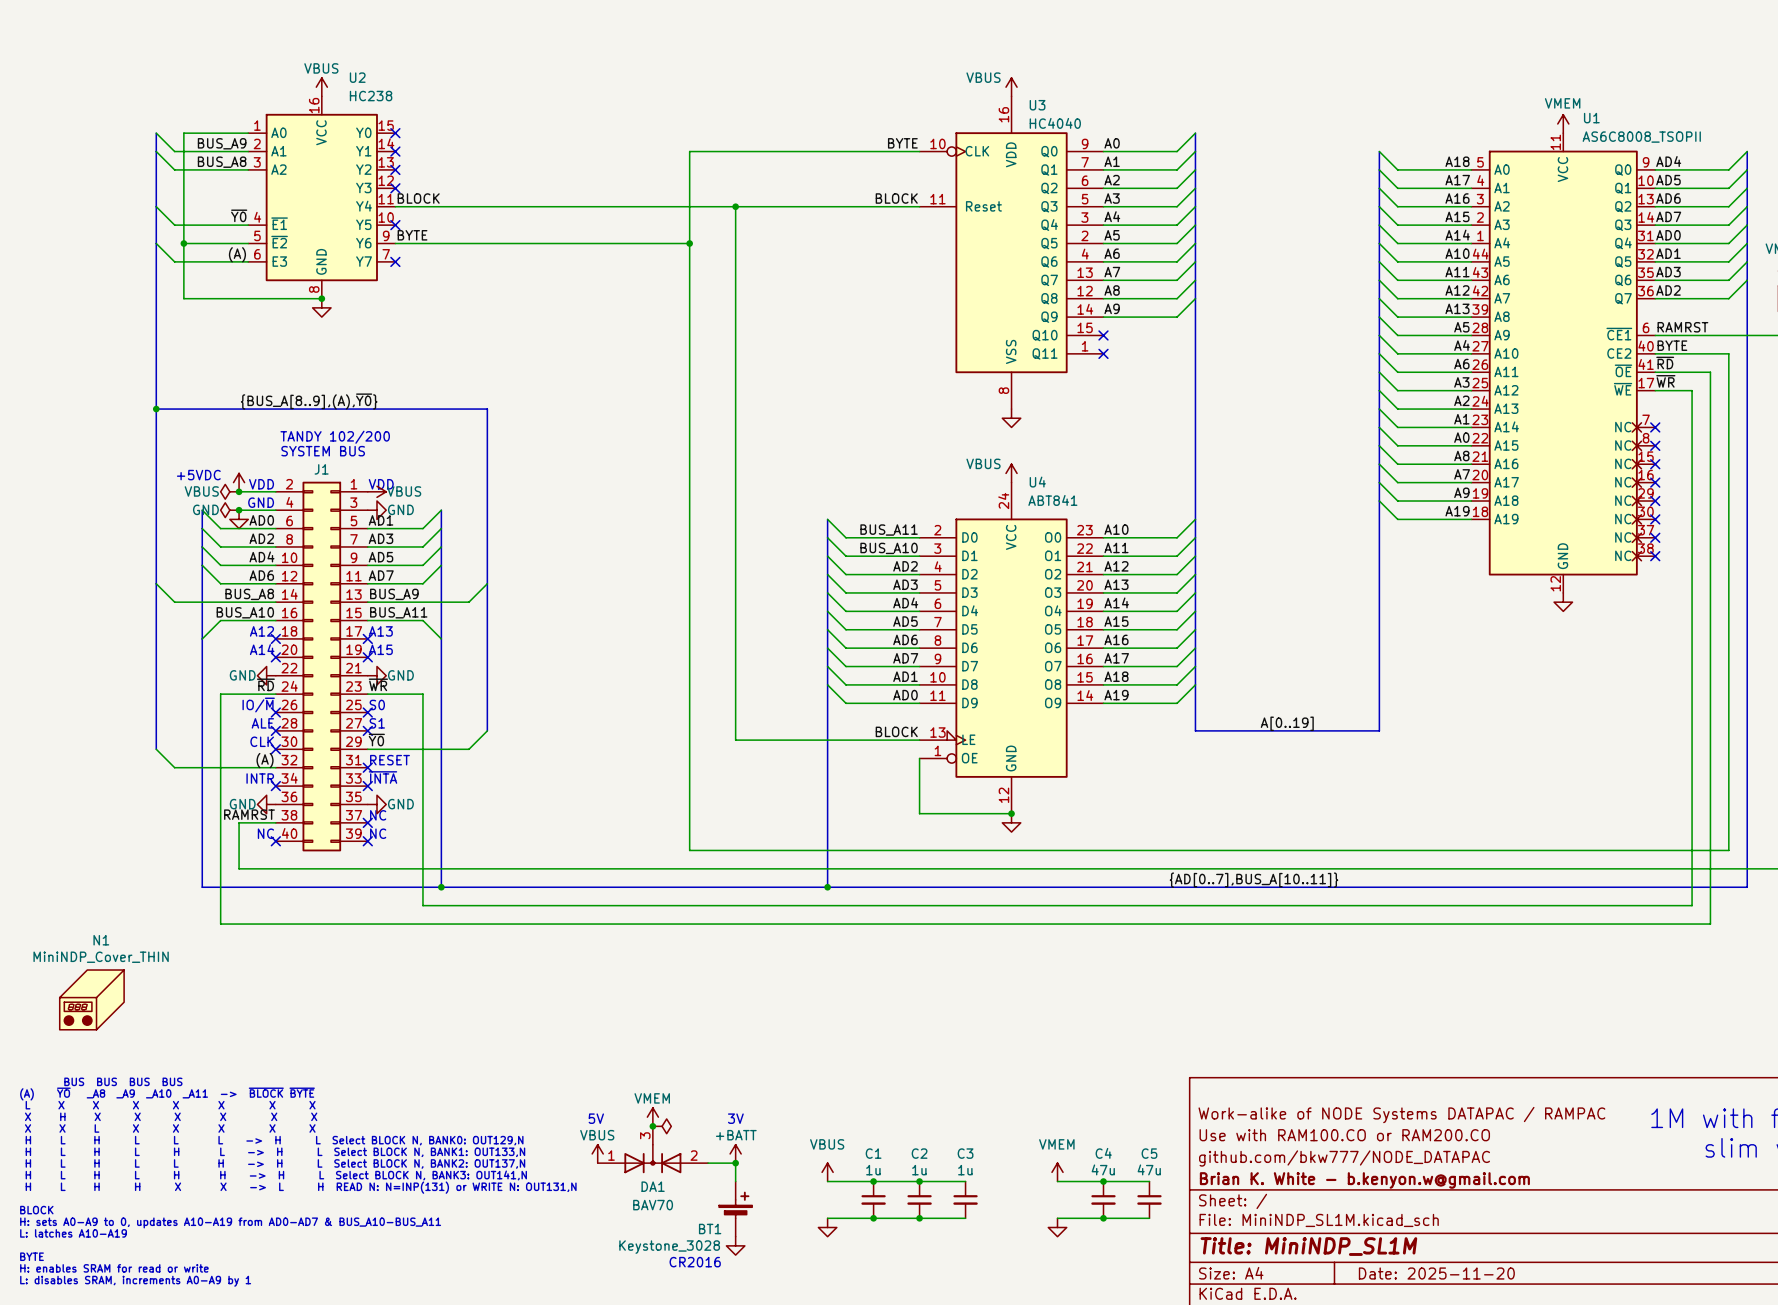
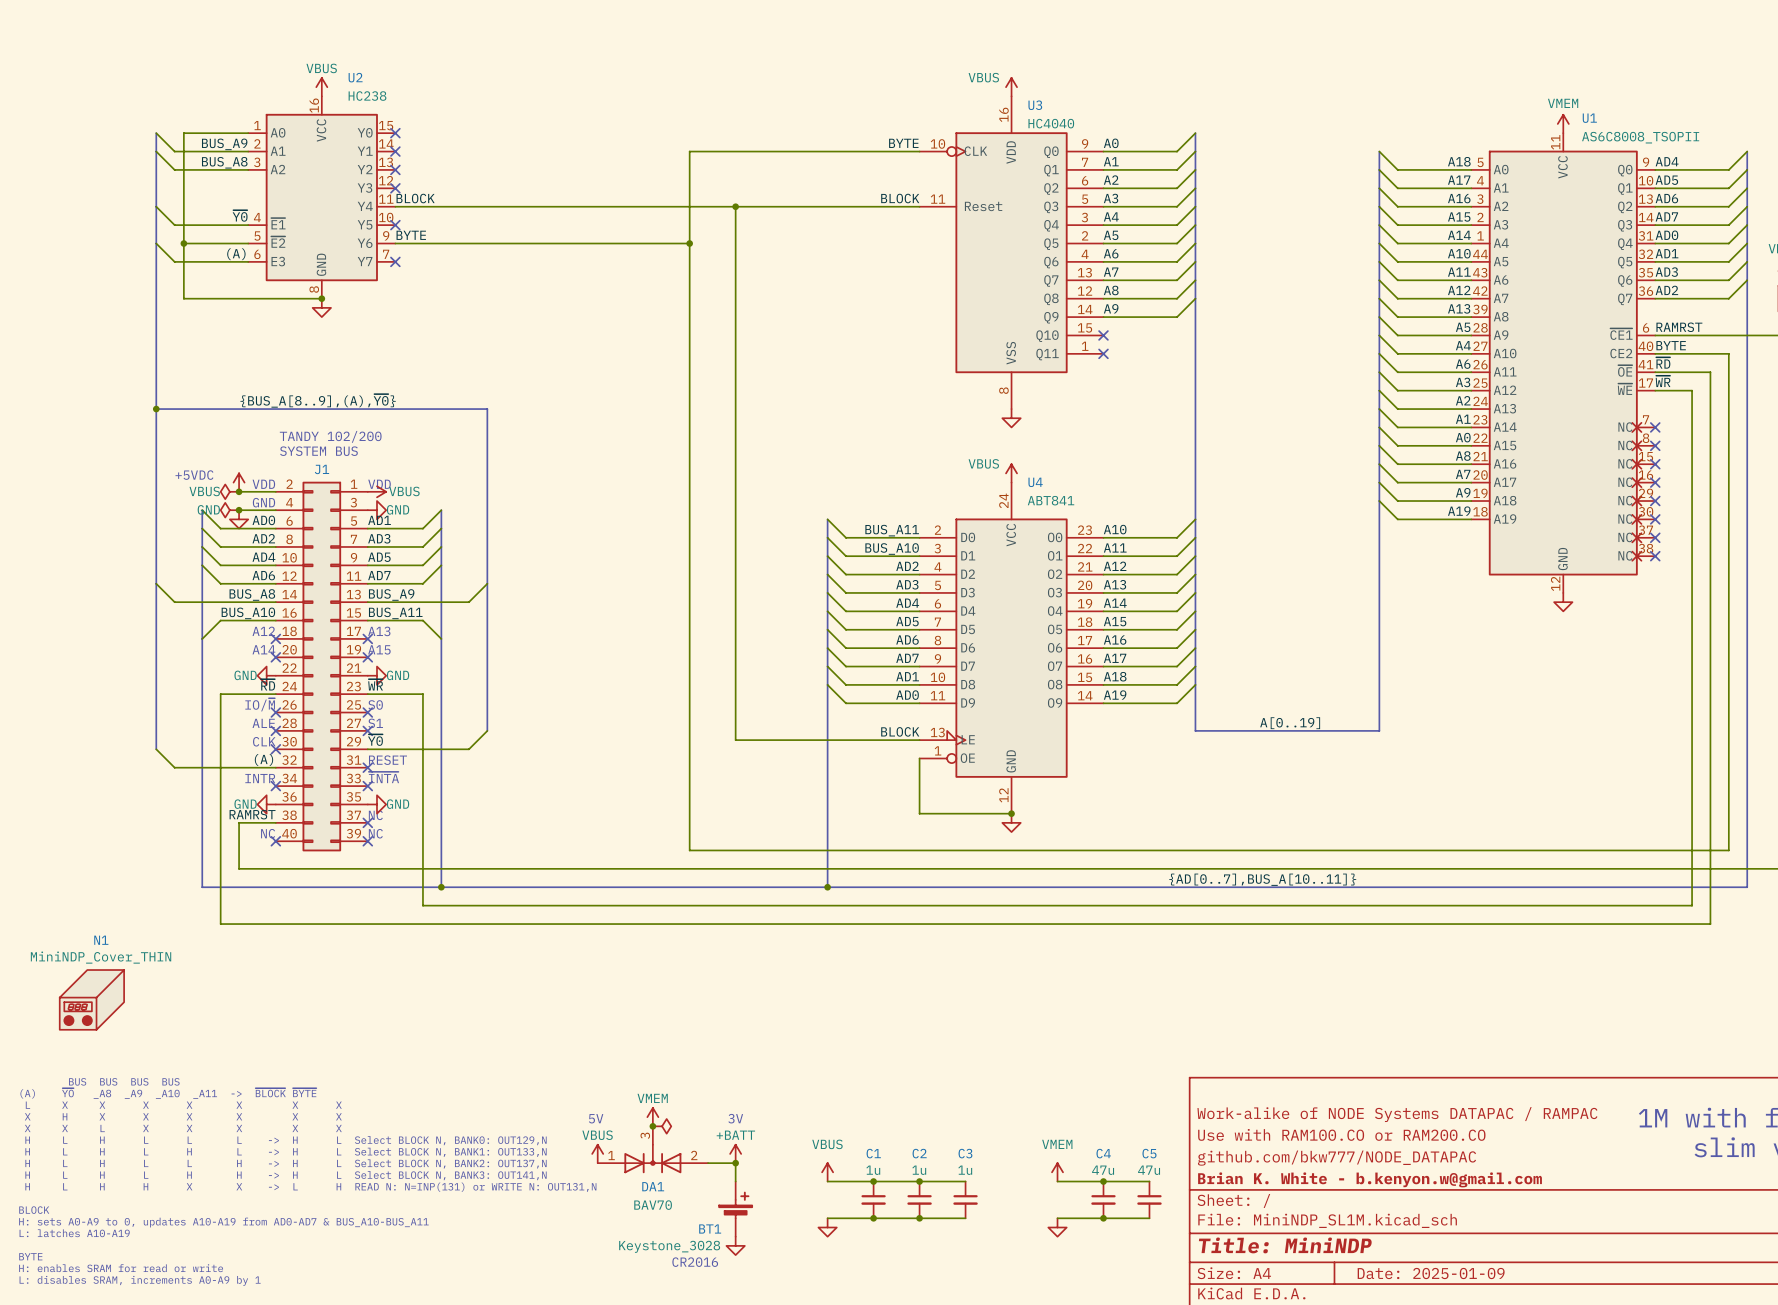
title block: Title: MiniNDP_SL1M (1308, 1246) -> Title: MiniNDP (1285, 1245)
title block: Date: 2025-11-20 (1436, 1273) -> Date: 2025-01-09 (1431, 1273)

